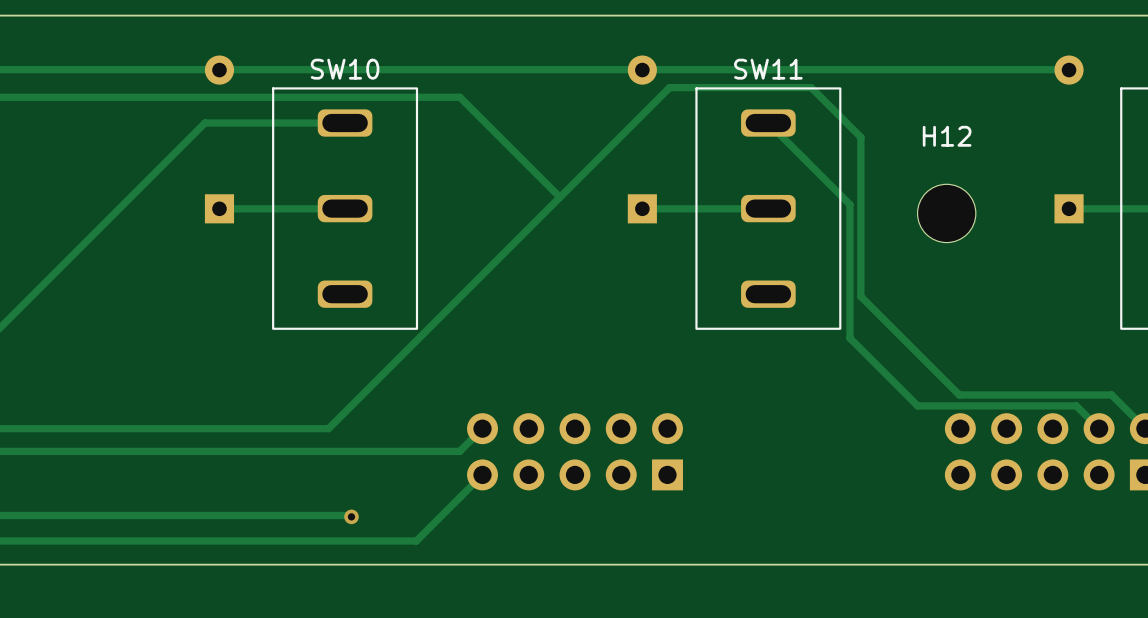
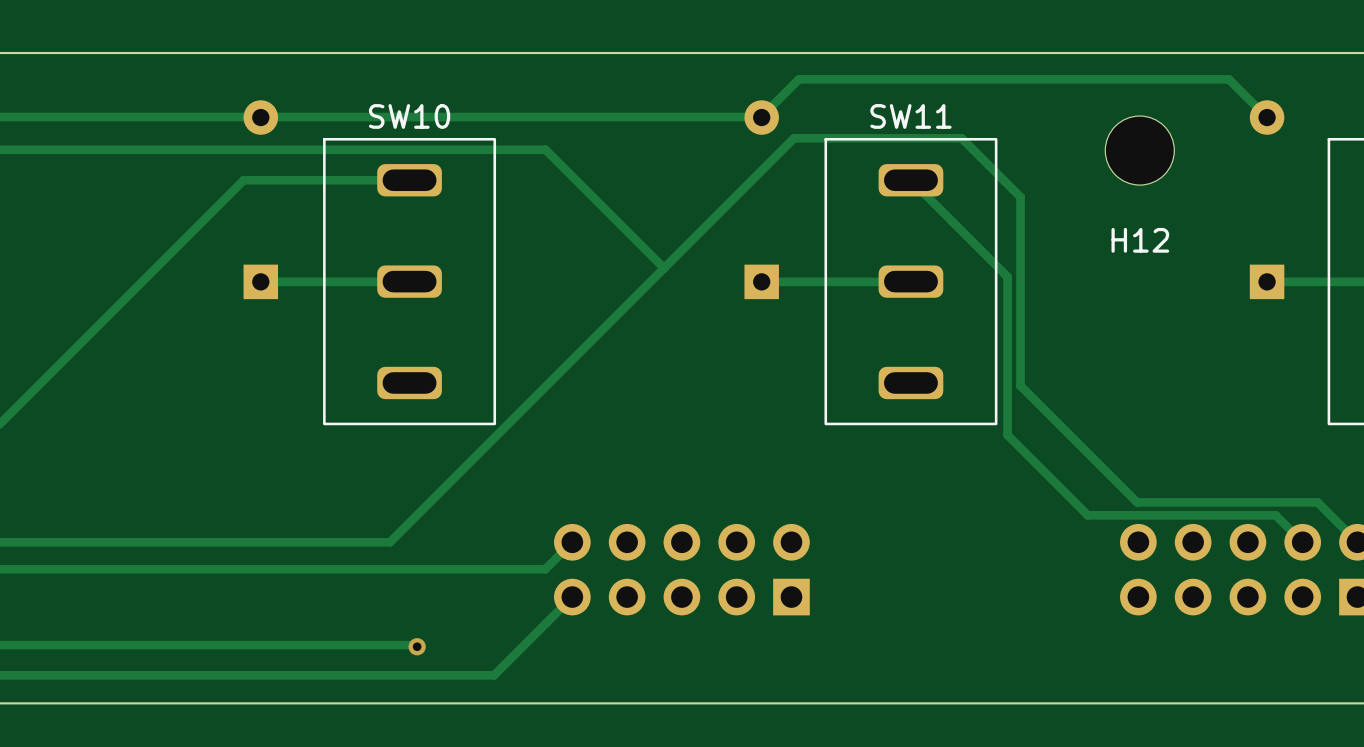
track: (641, 69) (1068, 69) -> (761, 117) (798, 79) (1228, 79) (1266, 117)
H12 name position: H12 (947, 136) -> H12 (1140, 240)
H12 position: (946, 213) -> (1139, 150)

